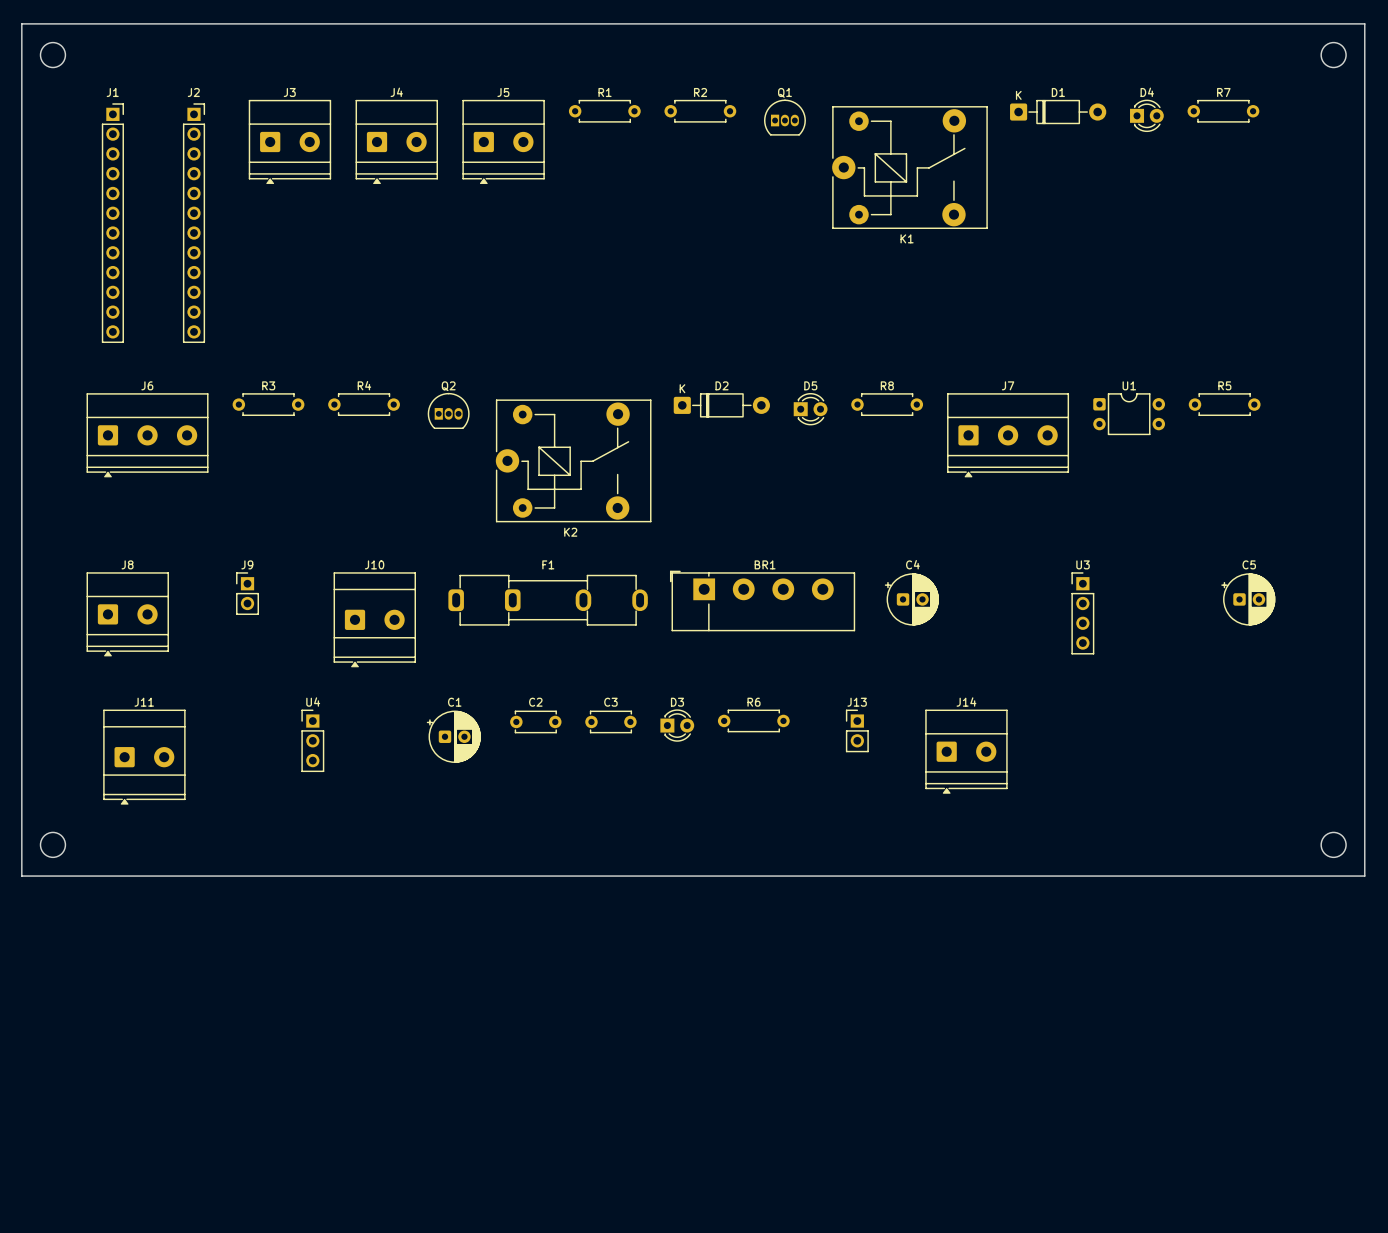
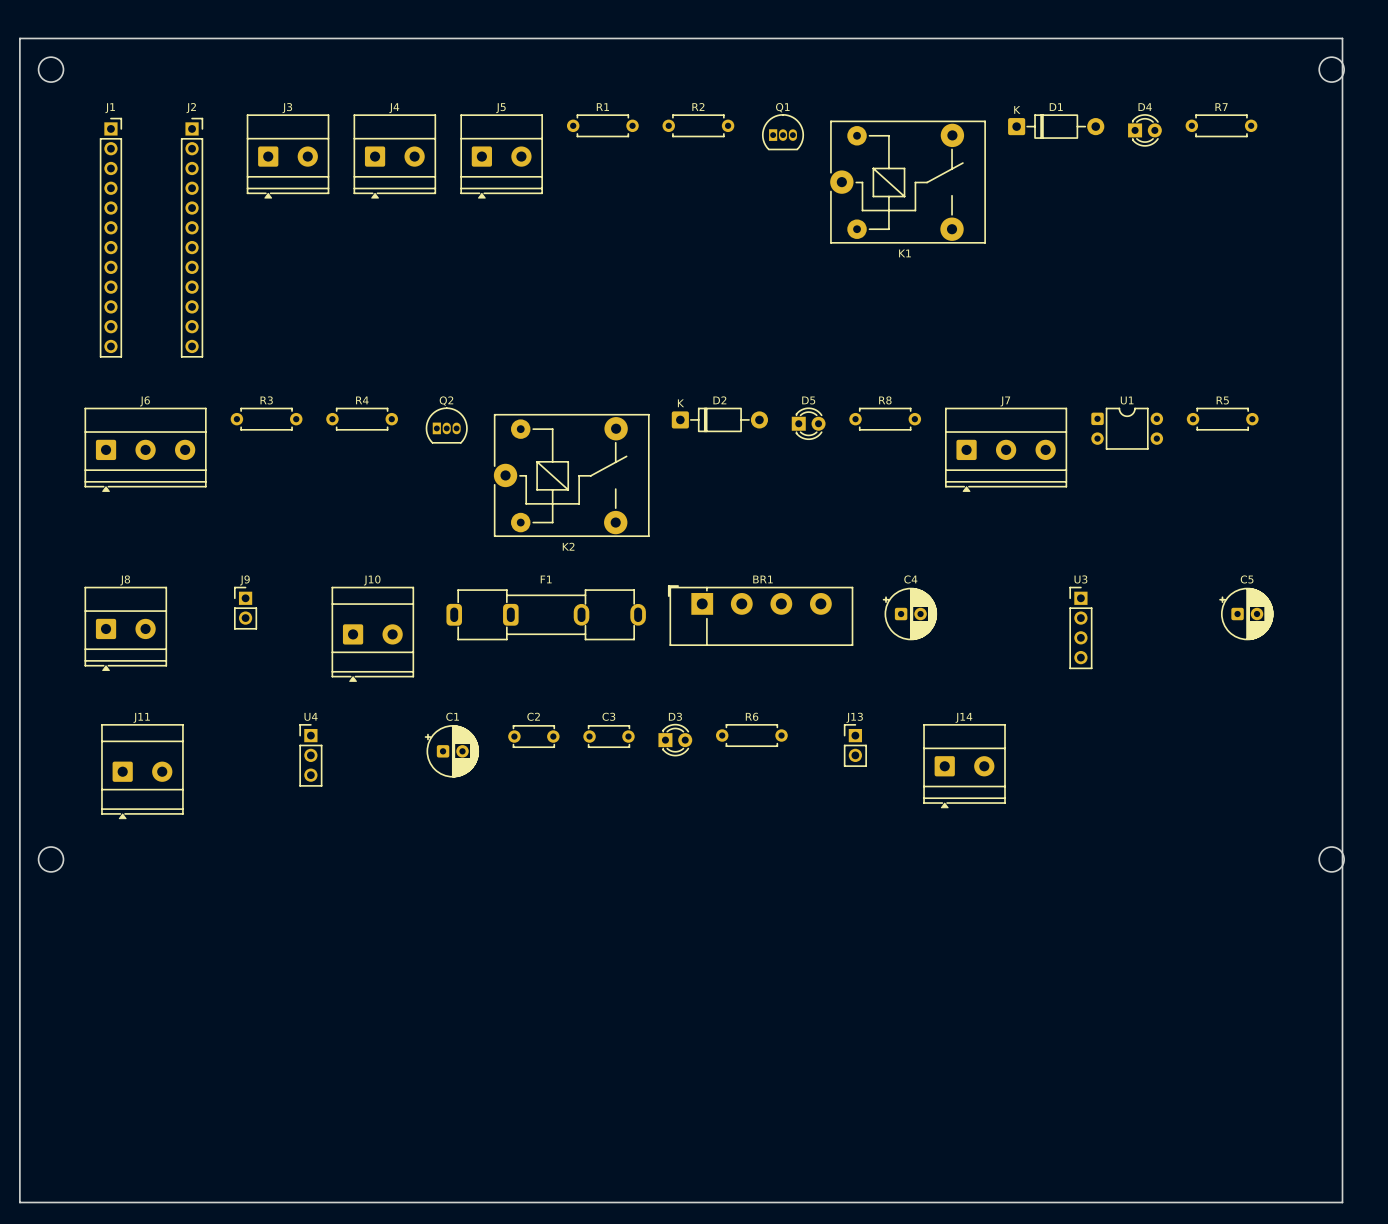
board edge: (1344, 23) (1364, 23) (1364, 876) (21, 876) -> (1342, 38) (1342, 1202) (19, 1202) (19, 890)

